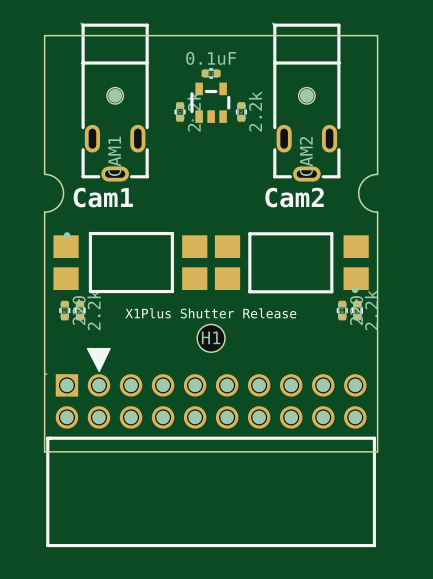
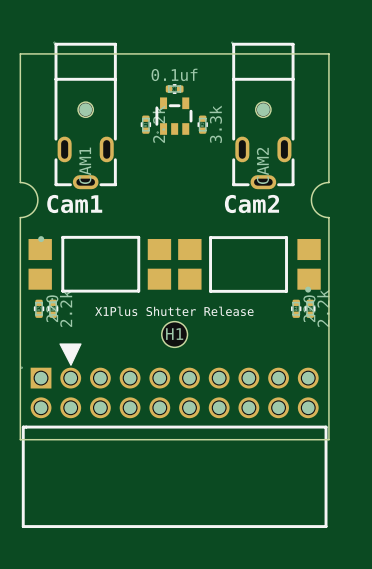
part value: 0.1uF (211, 58) -> 0.1uf (174, 74)
part value: 2.2k (255, 111) -> 3.3k (215, 124)

